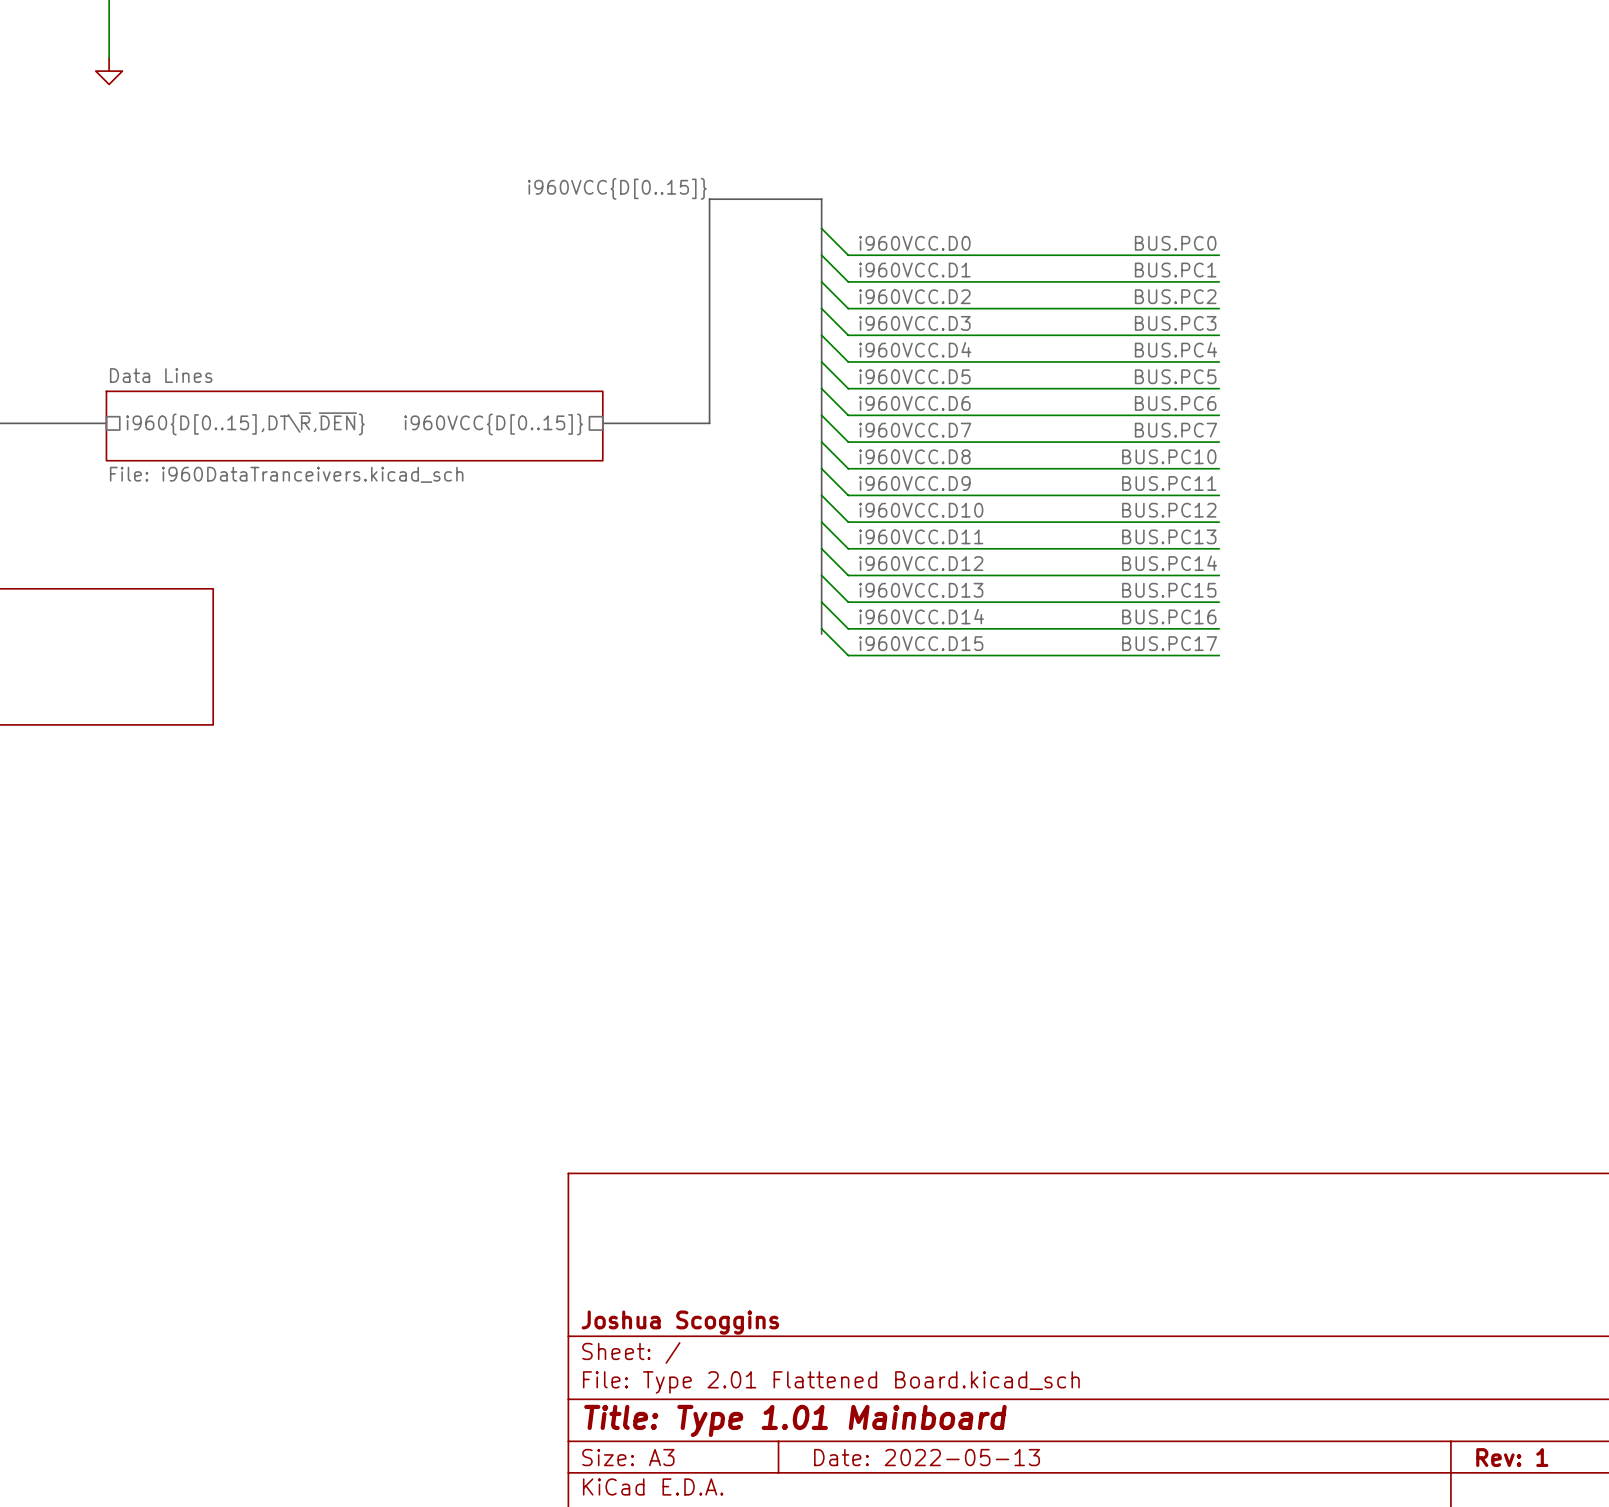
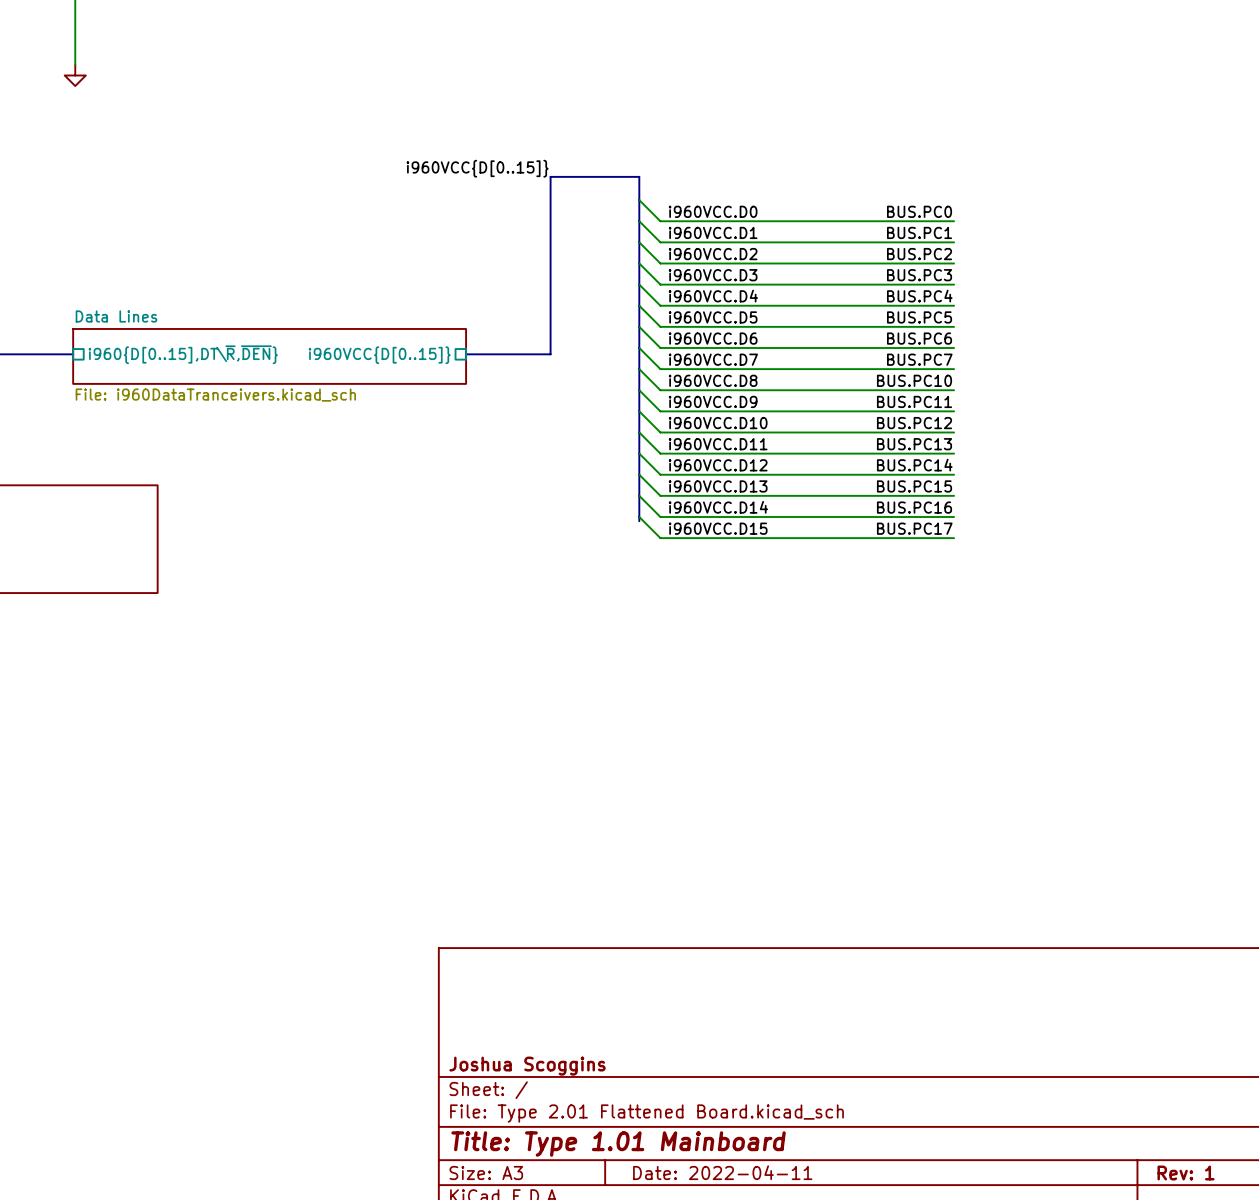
title block: Date: 2022-05-13 (927, 1457) -> Date: 2022-04-11 (722, 1172)

